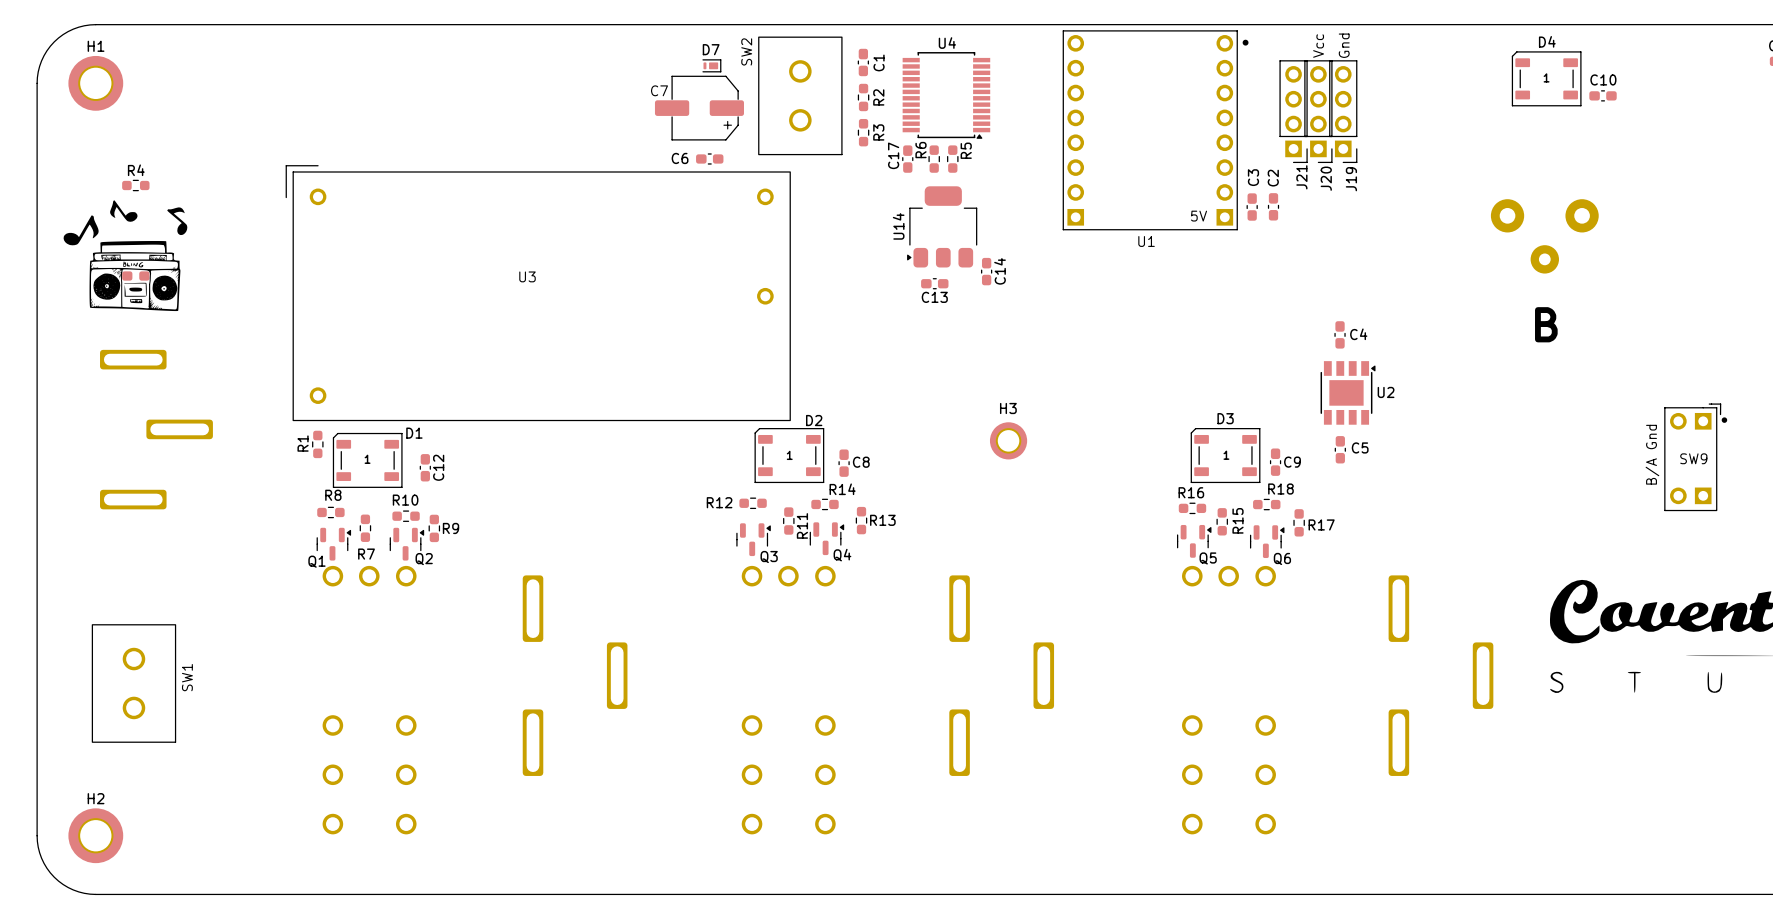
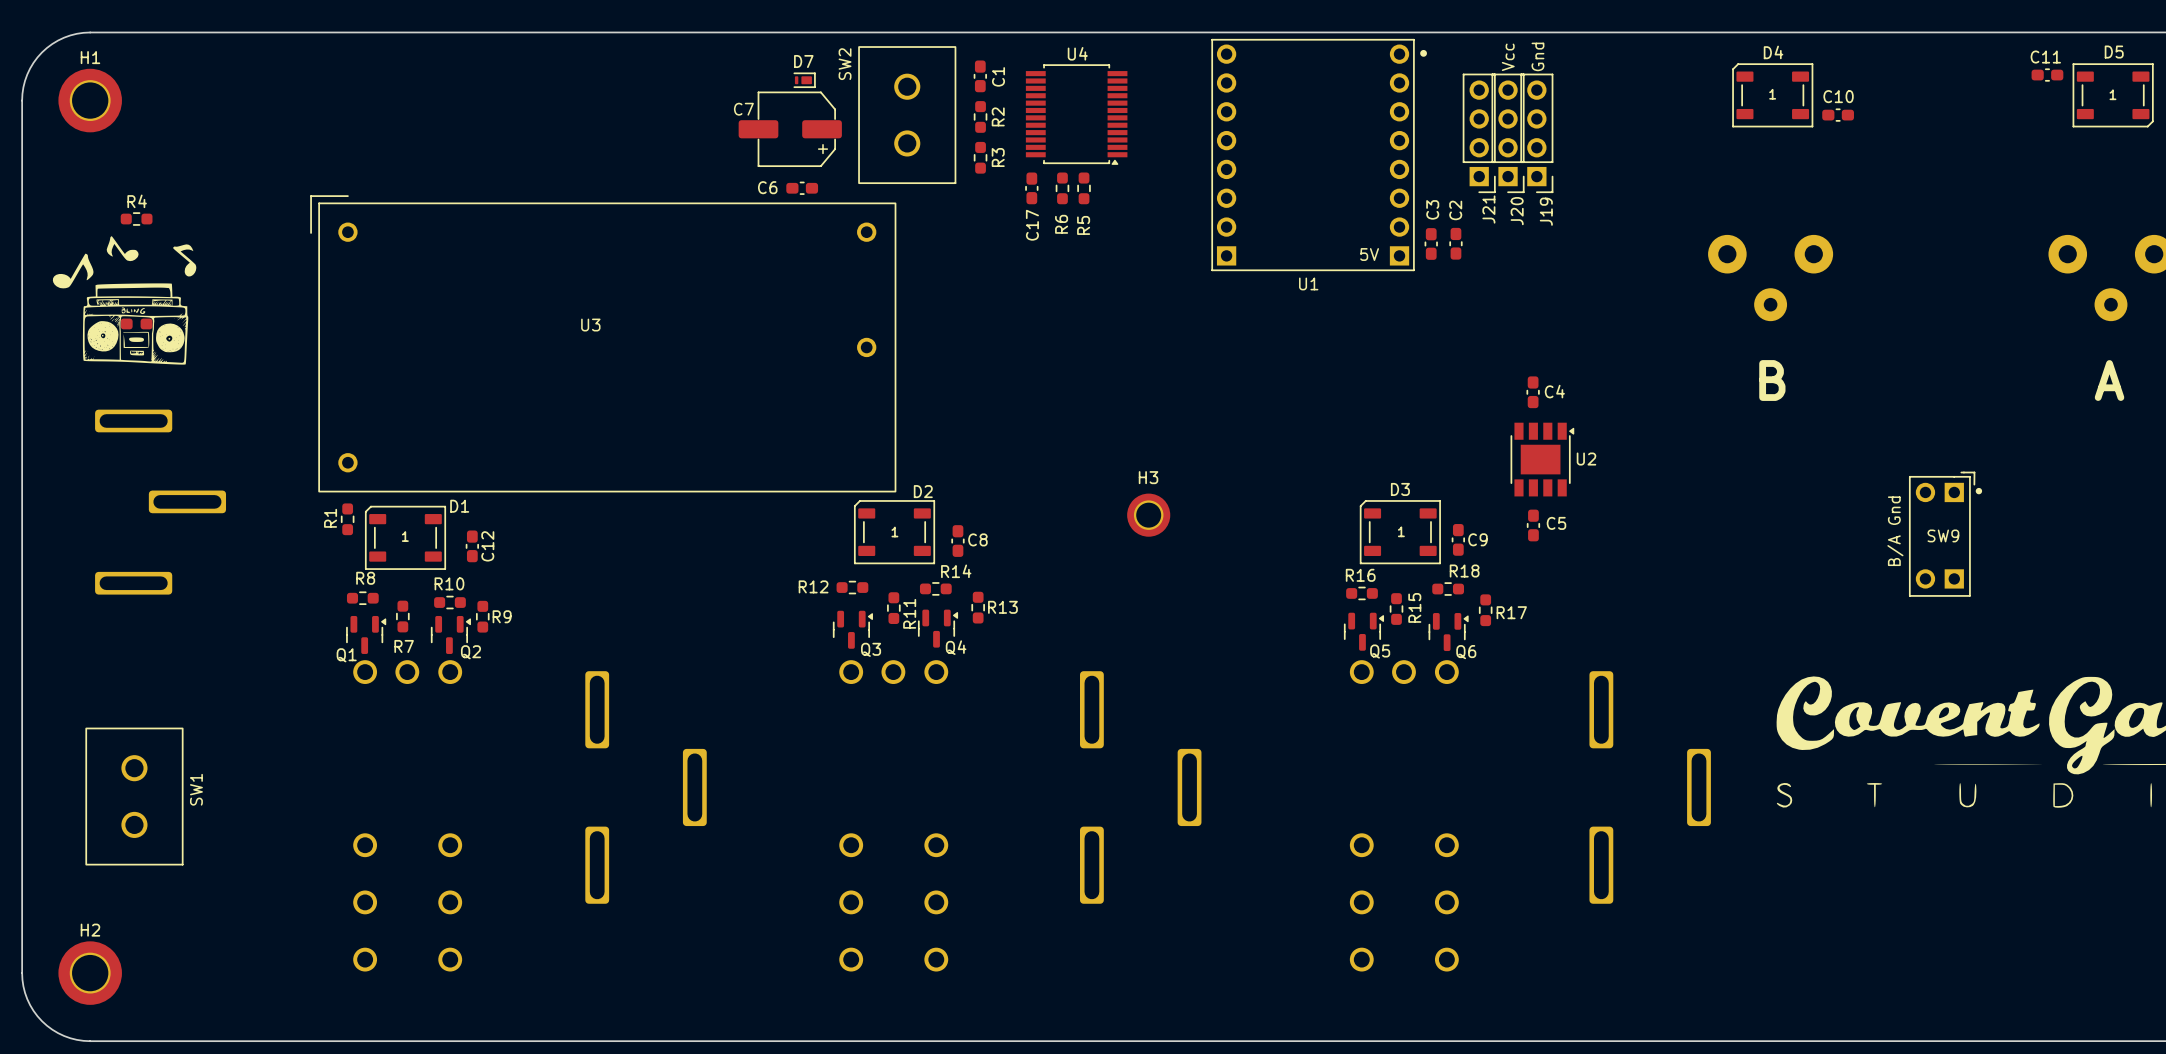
R6 name position: R6 (921, 150) -> R6 (1061, 224)
R5 name position: R5 (966, 150) -> R5 (1083, 225)
C17 name position: C17 (893, 155) -> C17 (1032, 225)
U14: (942, 226) -> none
C14: (986, 271) -> none
C13: (934, 283) -> none

